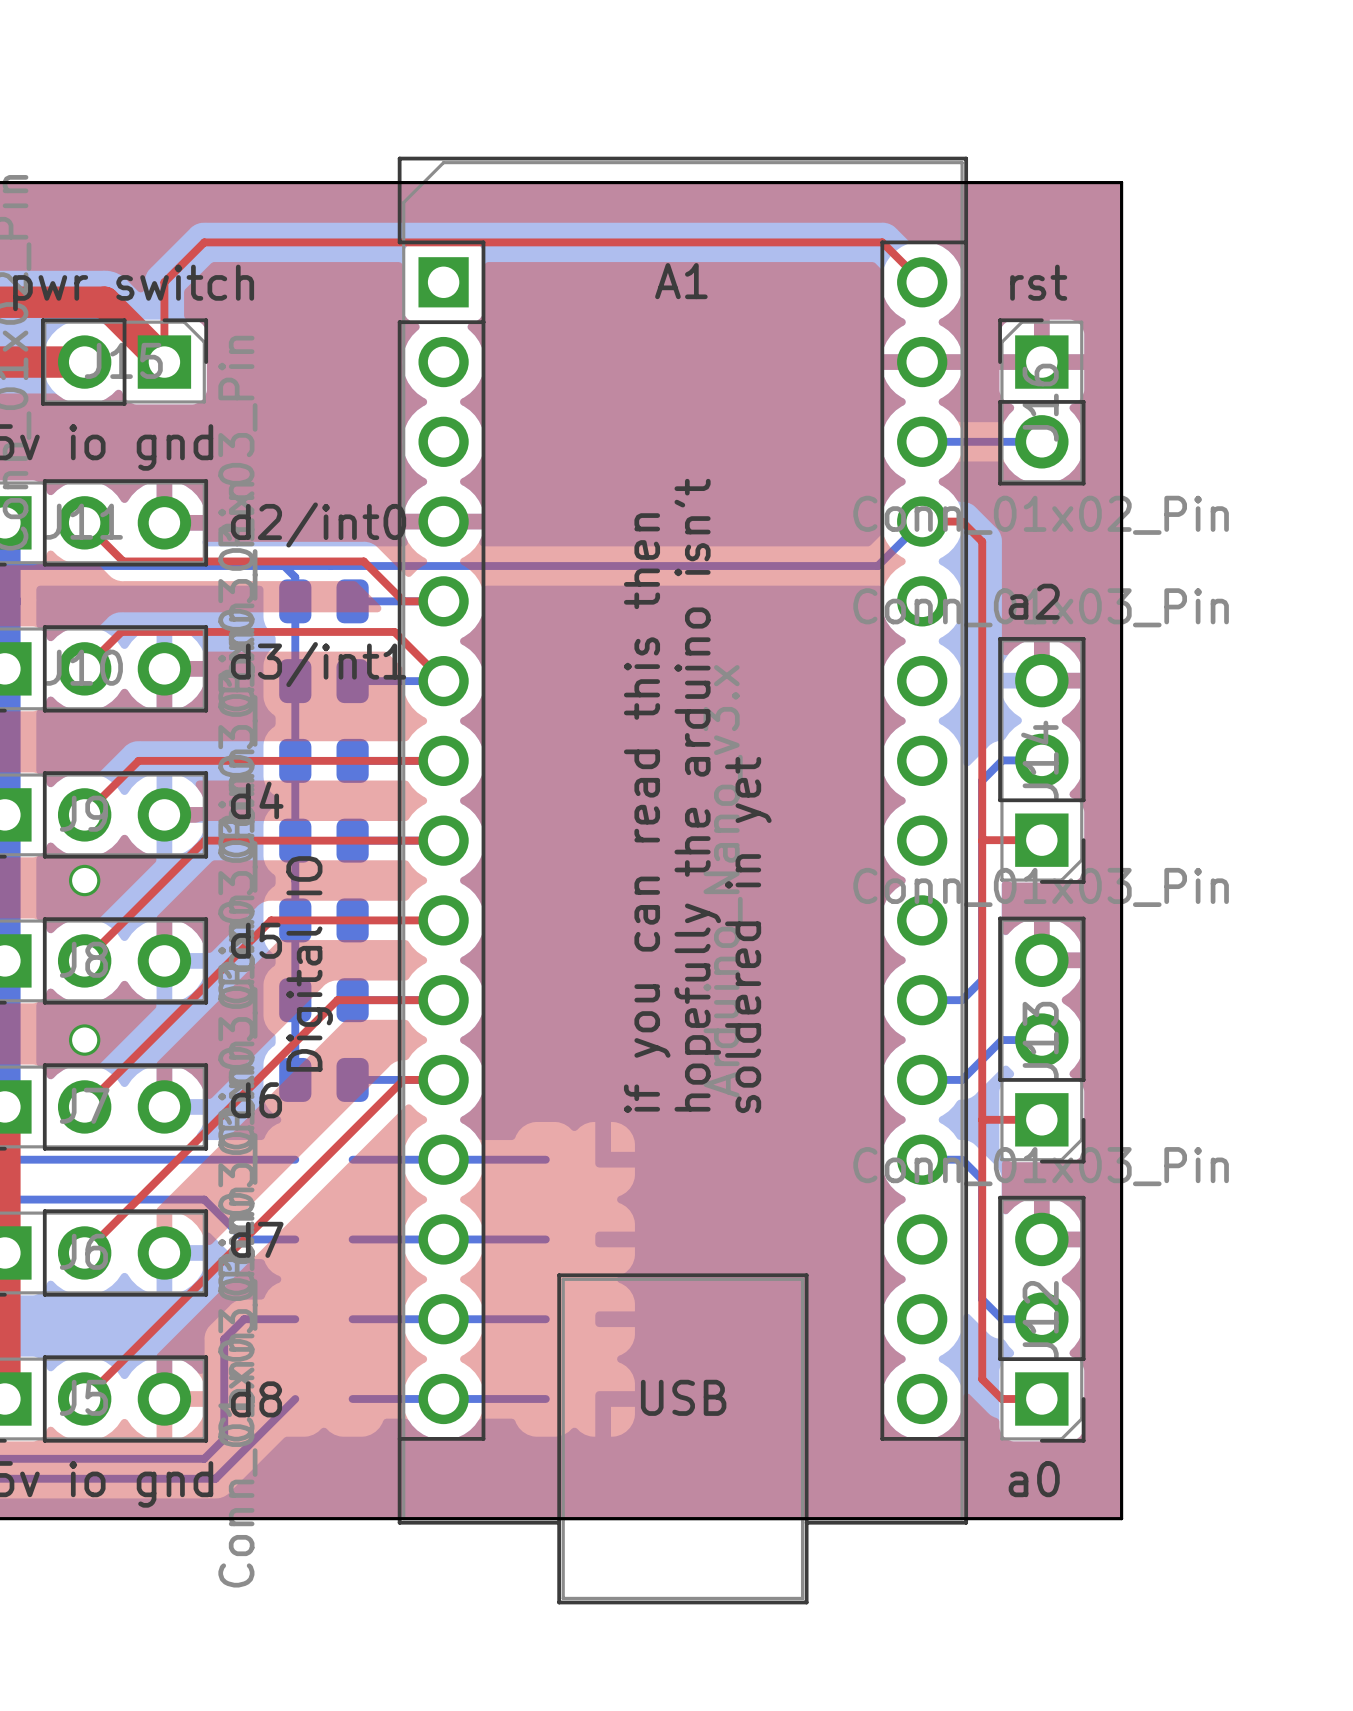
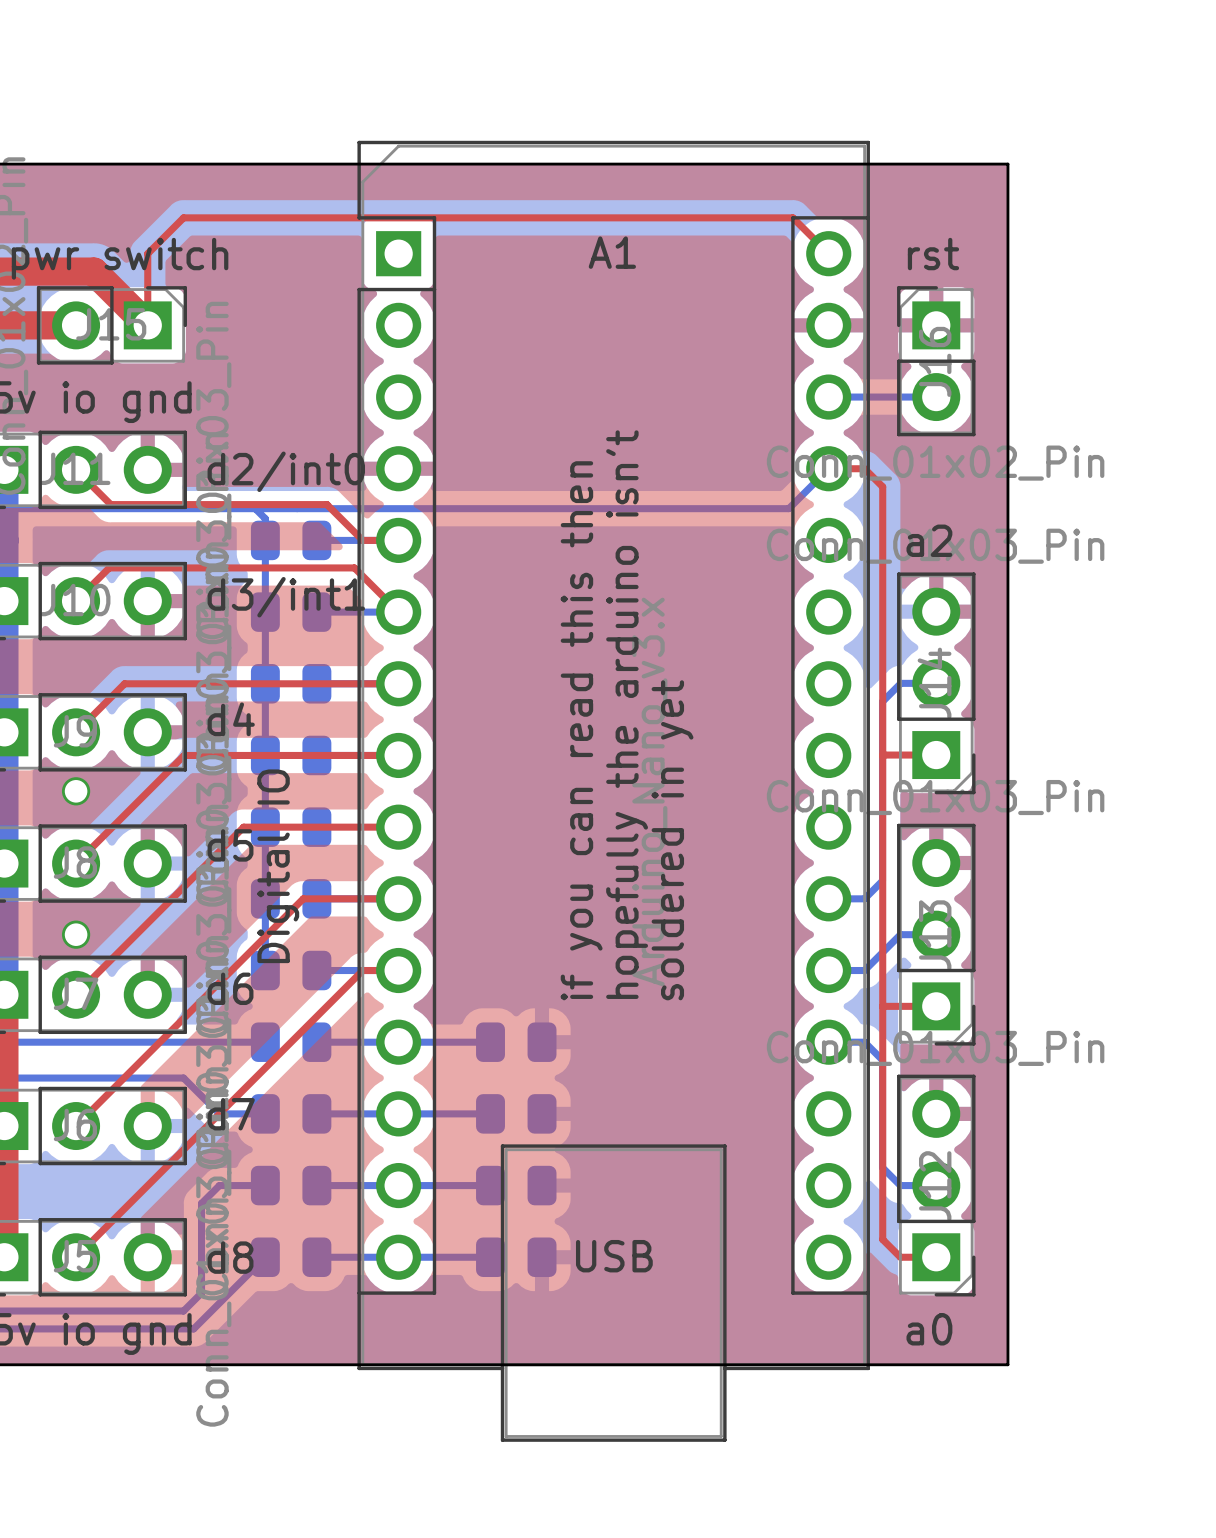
part: none -> (291, 1042)
part: none -> (516, 1042)
part: none -> (291, 1113)
part: none -> (516, 1113)
part: none -> (291, 1185)
part: none -> (516, 1185)
part: none -> (291, 1257)
part: none -> (516, 1257)

